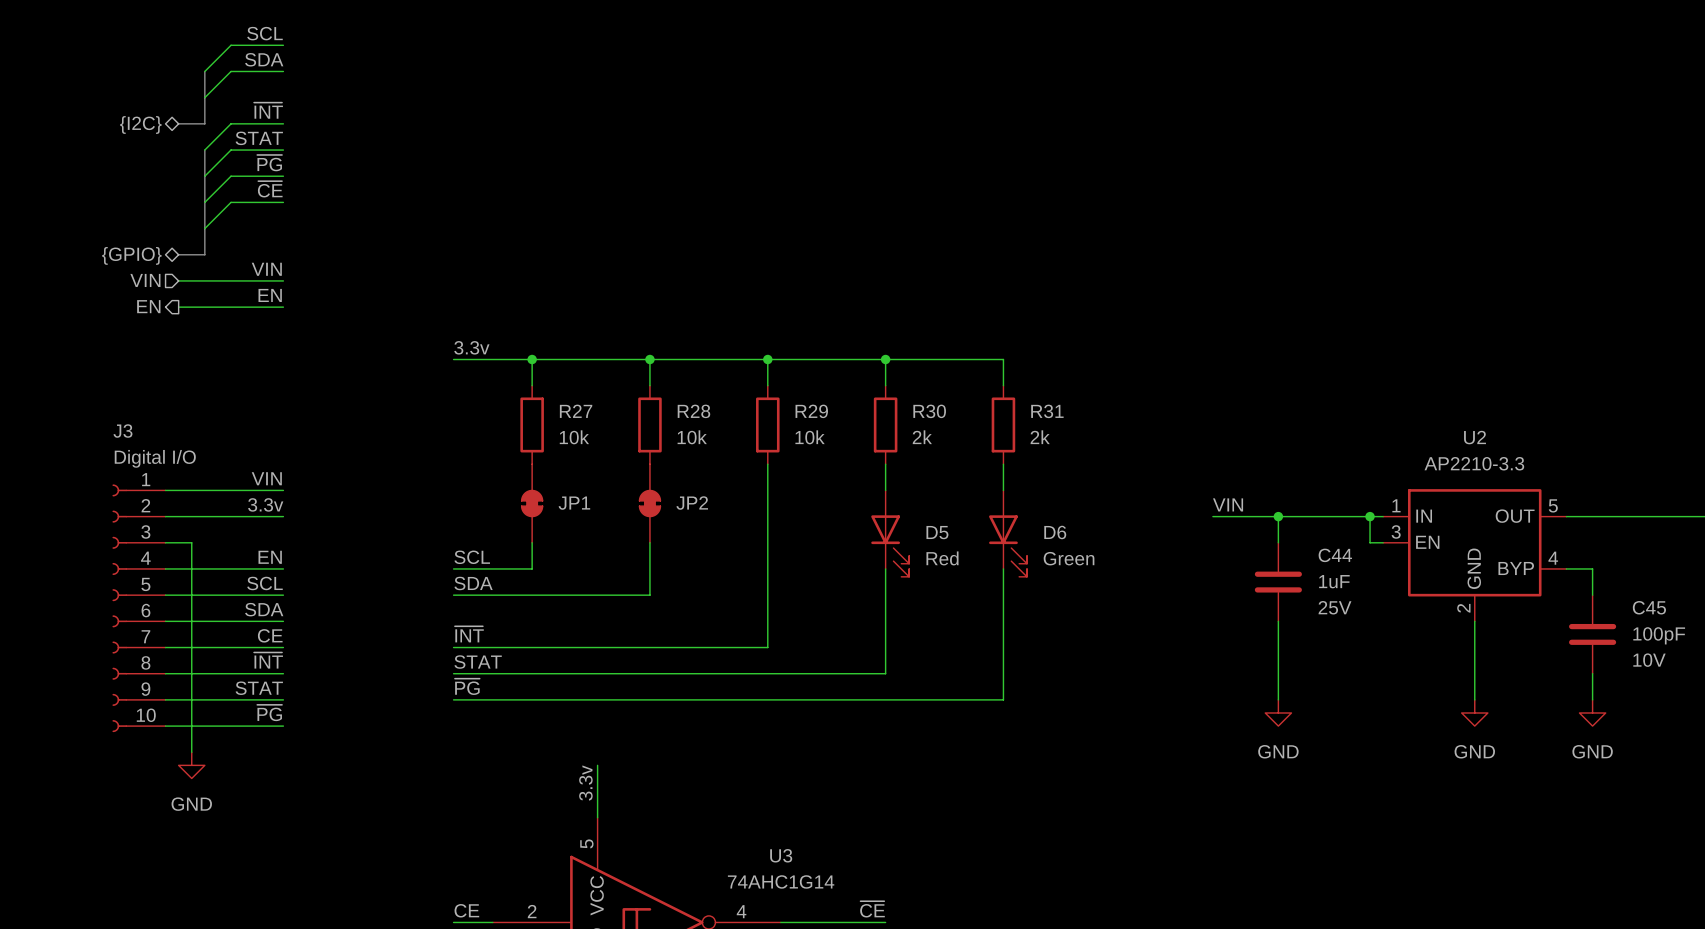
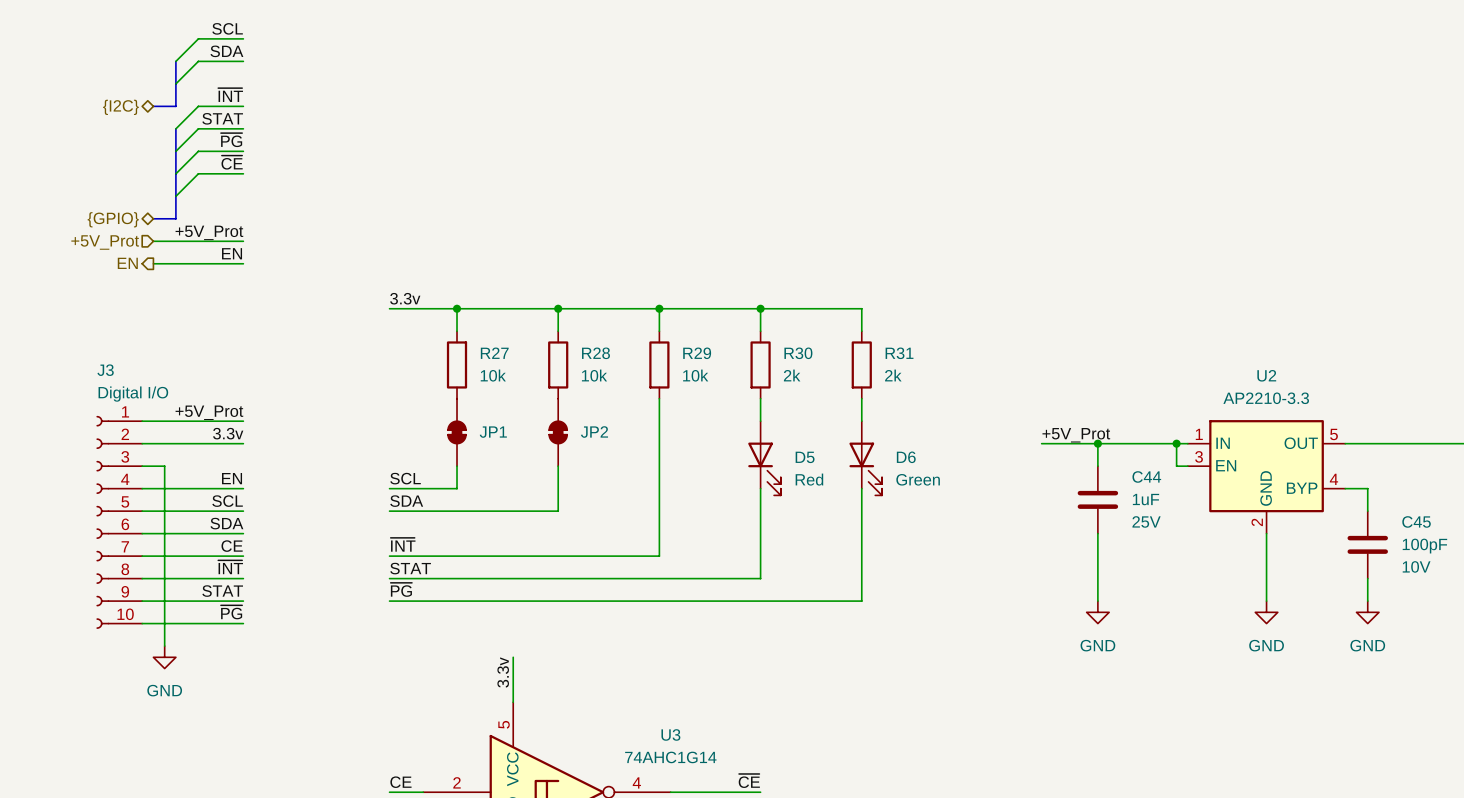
label: VIN (266, 269) -> +5V_Prot (209, 232)
hierarchical label: VIN (145, 280) -> +5V_Prot (105, 242)
label: VIN (266, 478) -> +5V_Prot (209, 412)
label: VIN (1228, 504) -> +5V_Prot (1076, 435)

